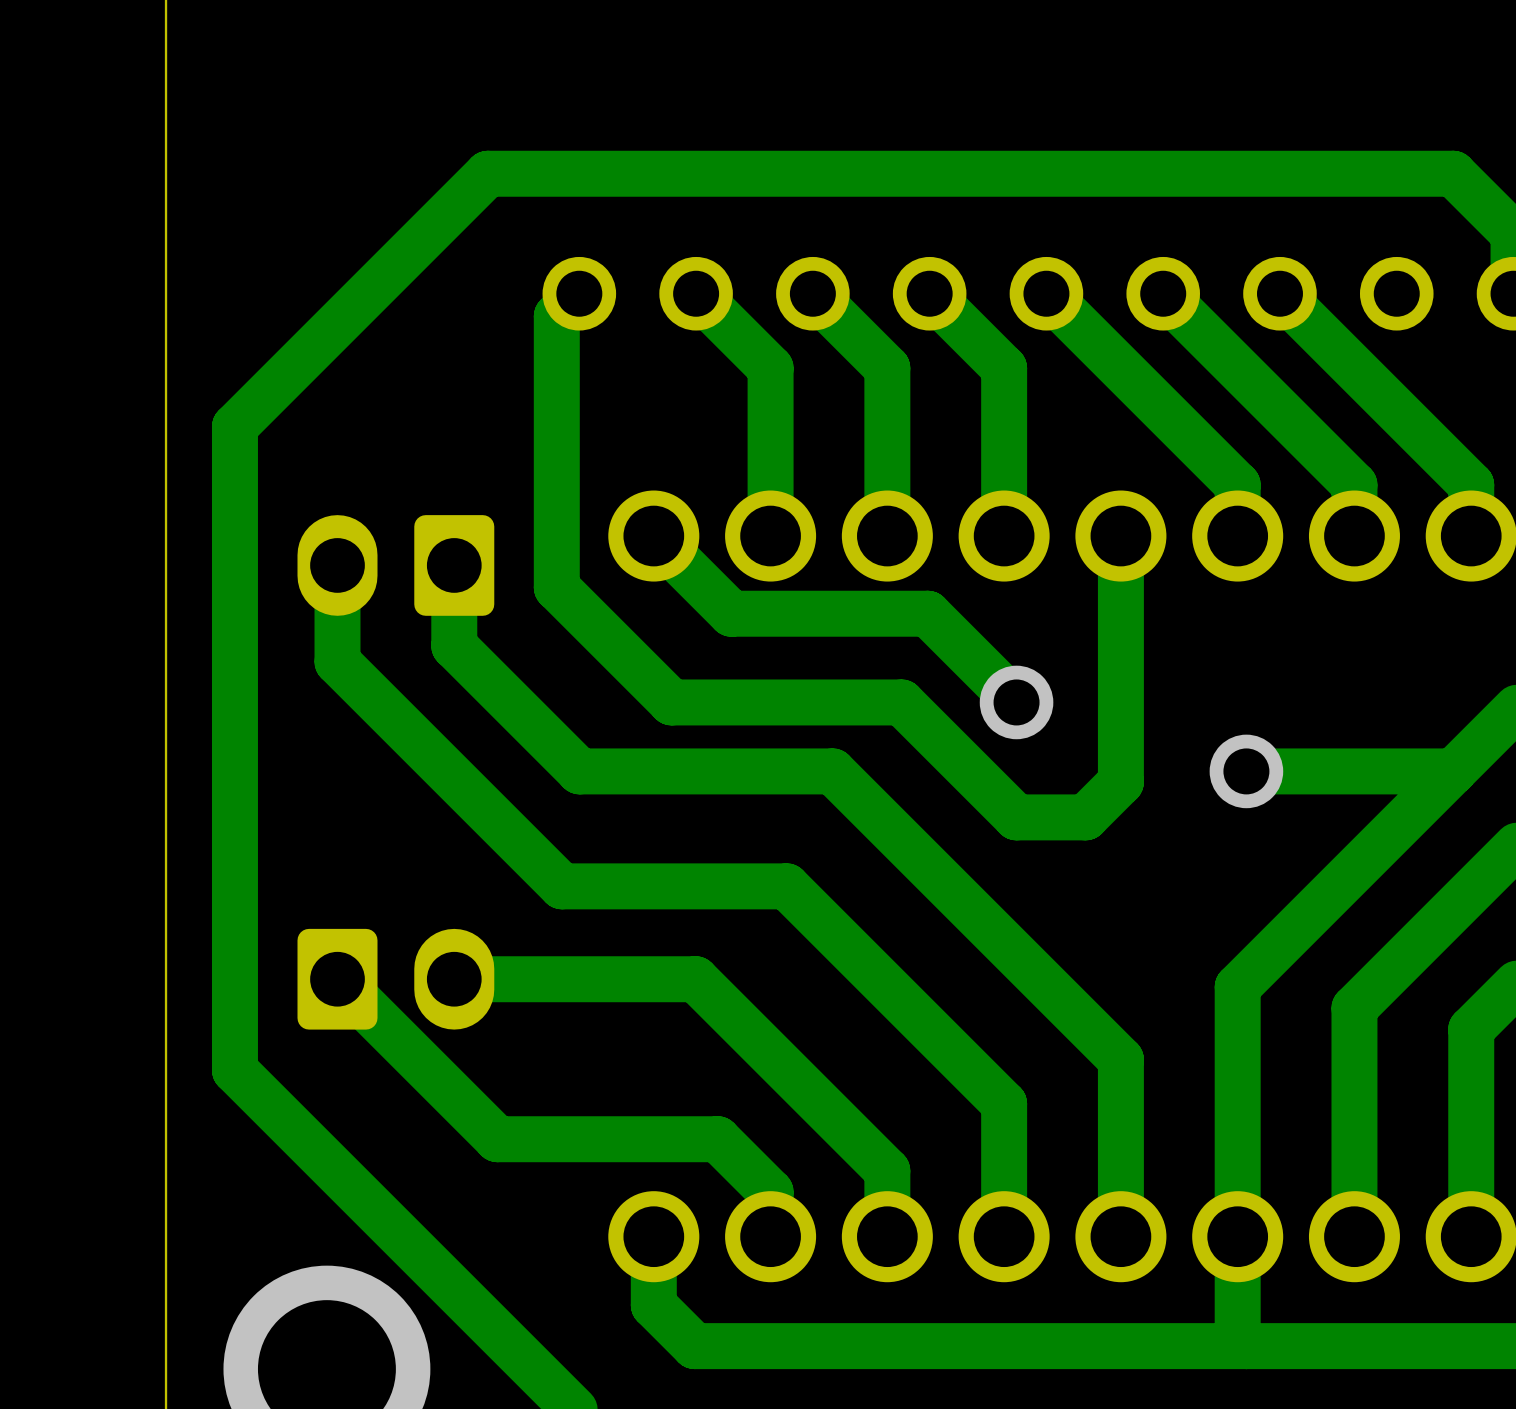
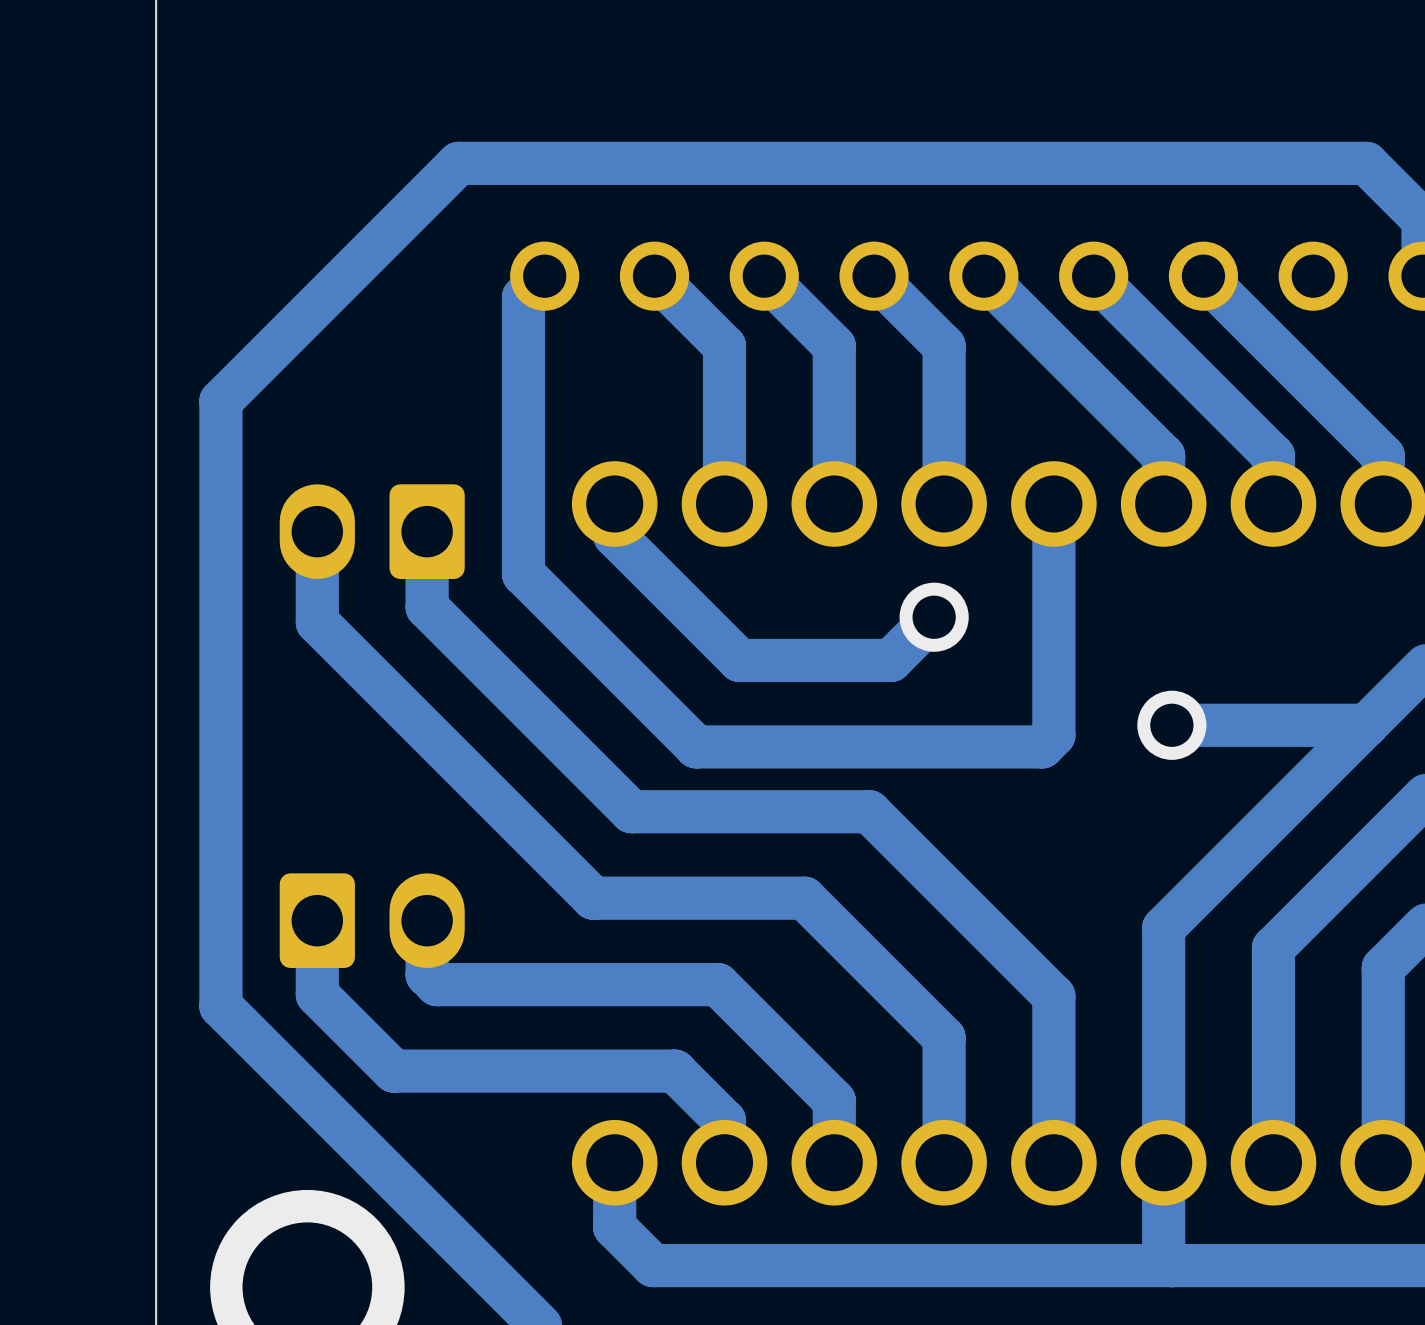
track: (653, 536) (731, 613) (927, 613) (1016, 702) -> none
track: (556, 587) (671, 702) (786, 702) -> (614, 503) (614, 535) (739, 660)
track: none -> (523, 552) (523, 574) (696, 746) (1042, 746)
track: (901, 702) (1016, 817) (1085, 817) (1108, 794) -> (847, 660) (890, 660) (934, 617)
via position: (1016, 702) -> (934, 617)
track: (579, 771) (832, 771) (924, 863) -> (545, 725) (631, 811) (869, 811)
track: (562, 886) (786, 886) (855, 955) -> (528, 833) (593, 898) (804, 898)
track: (337, 979) (497, 1139) -> (317, 920) (317, 994) (393, 1071) (467, 1071)
track: (454, 979) (695, 979) (763, 1047) -> (427, 920) (427, 974) (437, 984) (718, 984)

